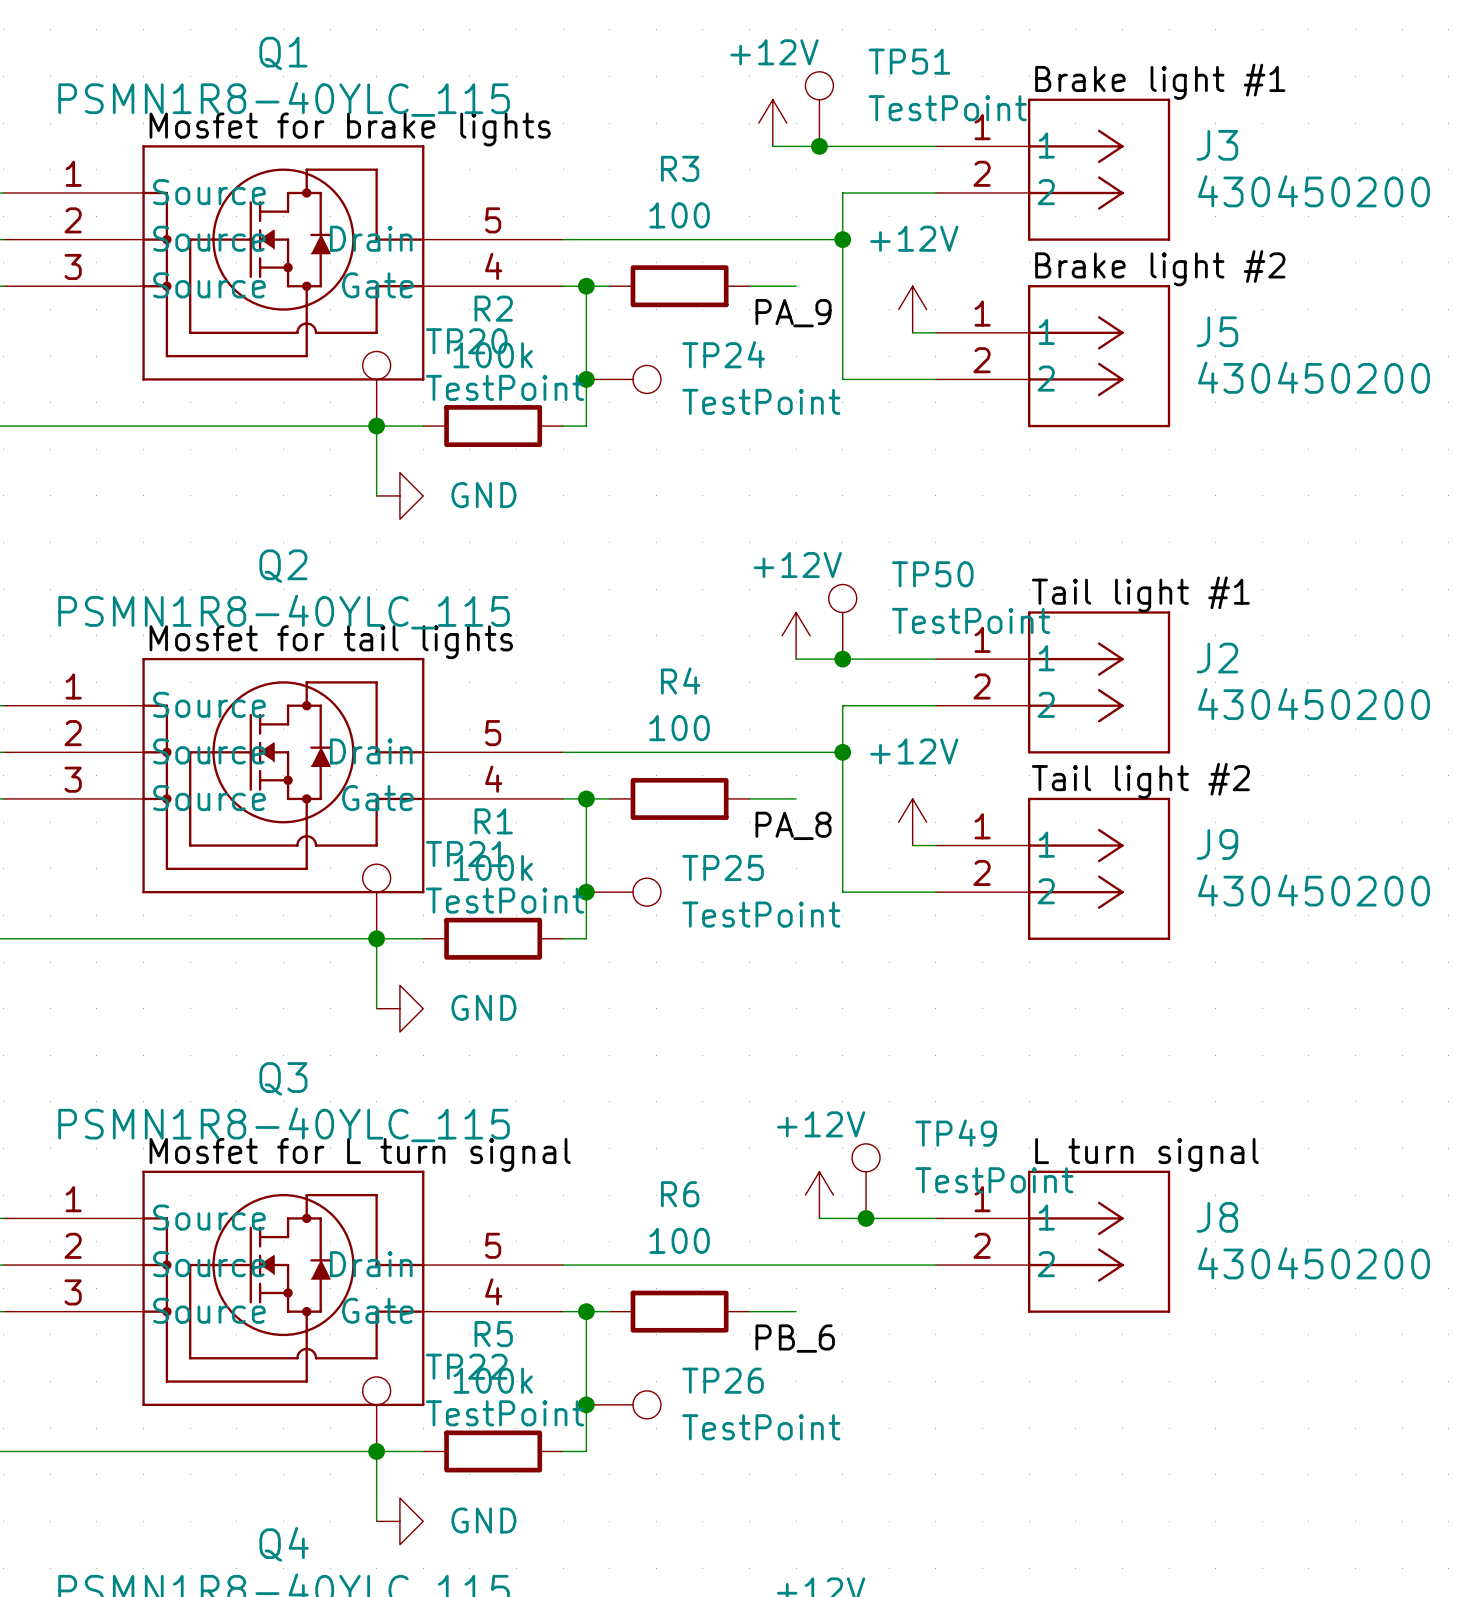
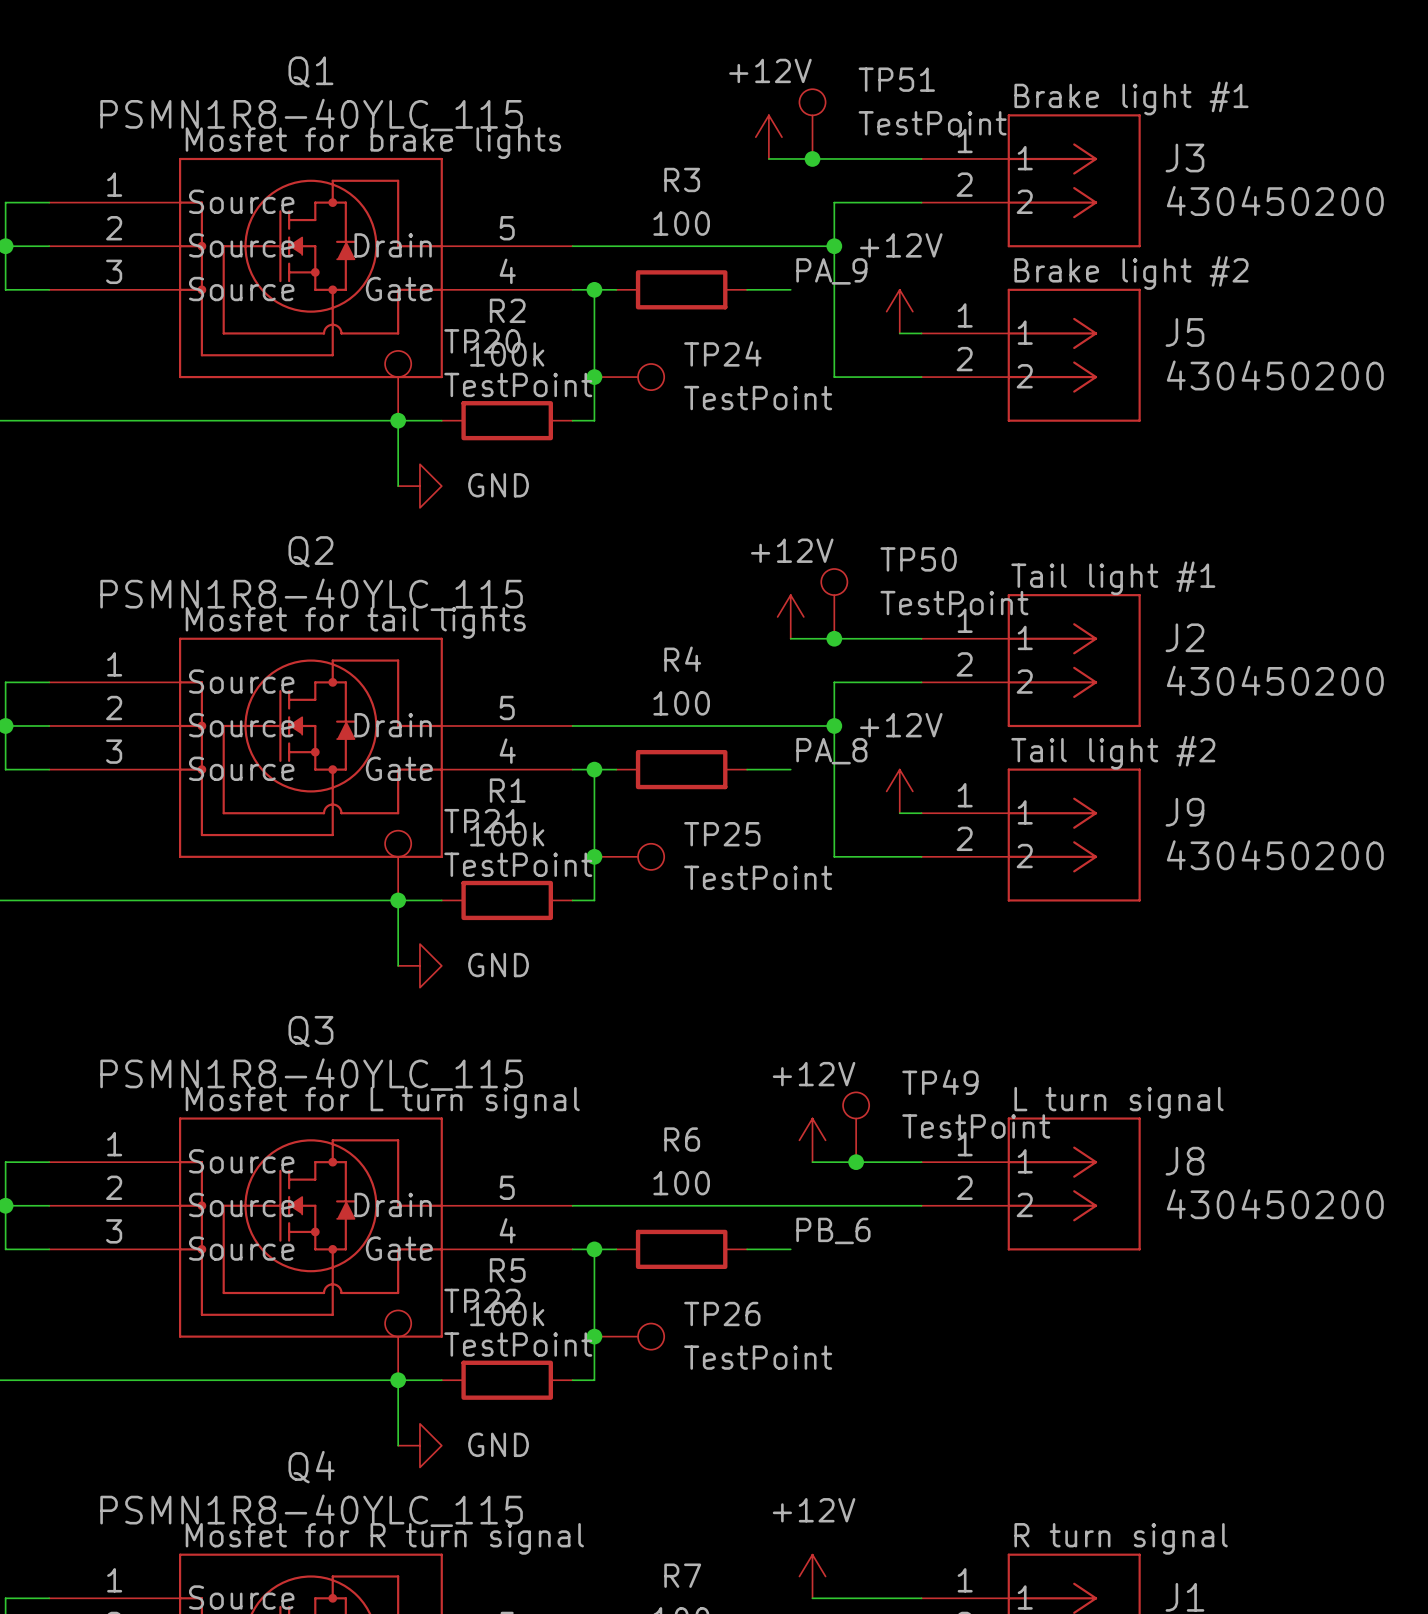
label position: PA_9 (793, 313) -> PA_9 (831, 271)
label position: PA_8 (793, 825) -> PA_8 (831, 751)
label position: PB_6 (795, 1338) -> PB_6 (833, 1230)

